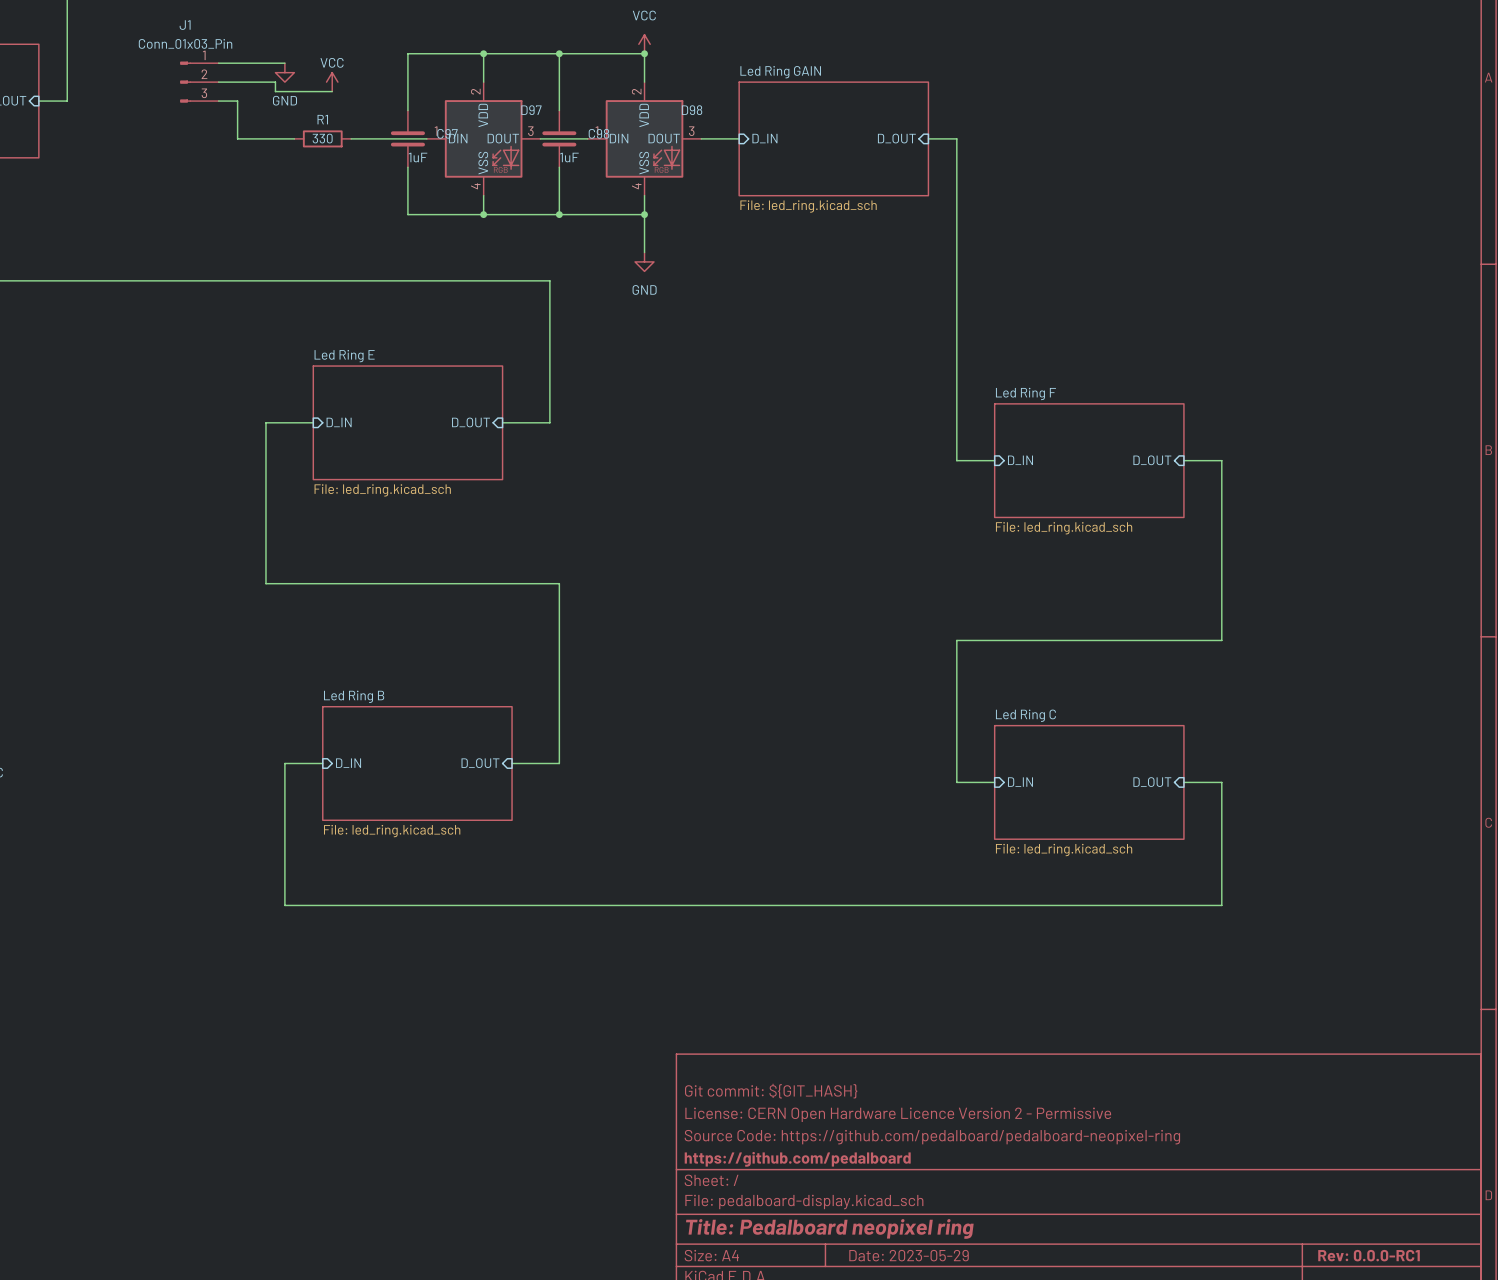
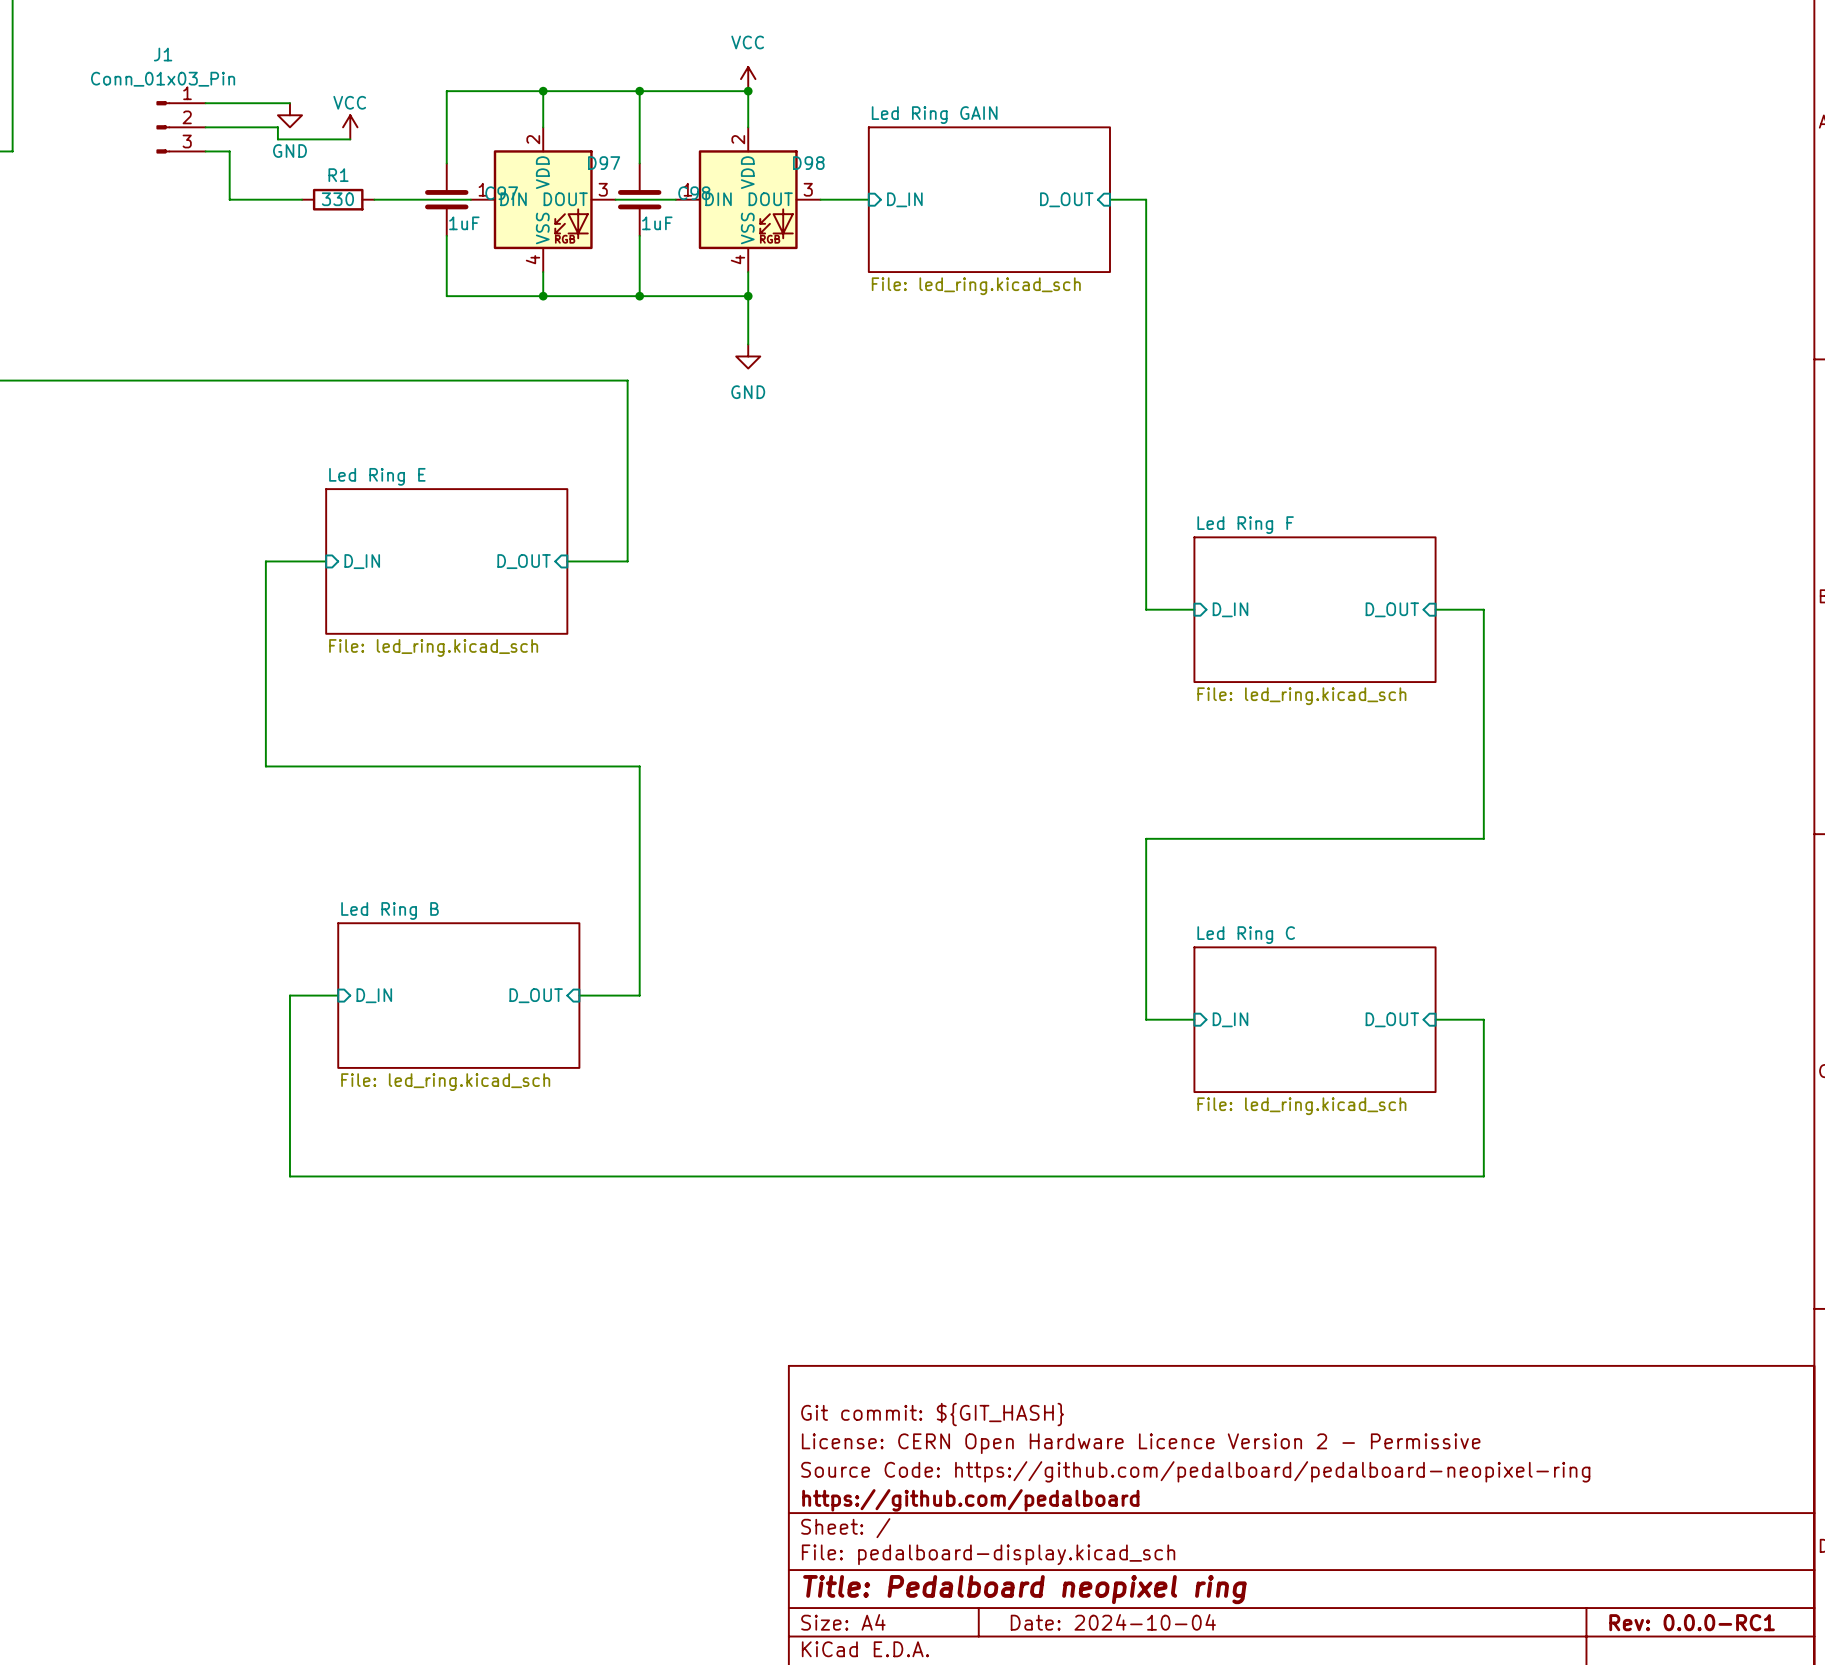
title block: Date: 2023-05-29 (909, 1255) -> Date: 2024-10-04 (1113, 1622)

